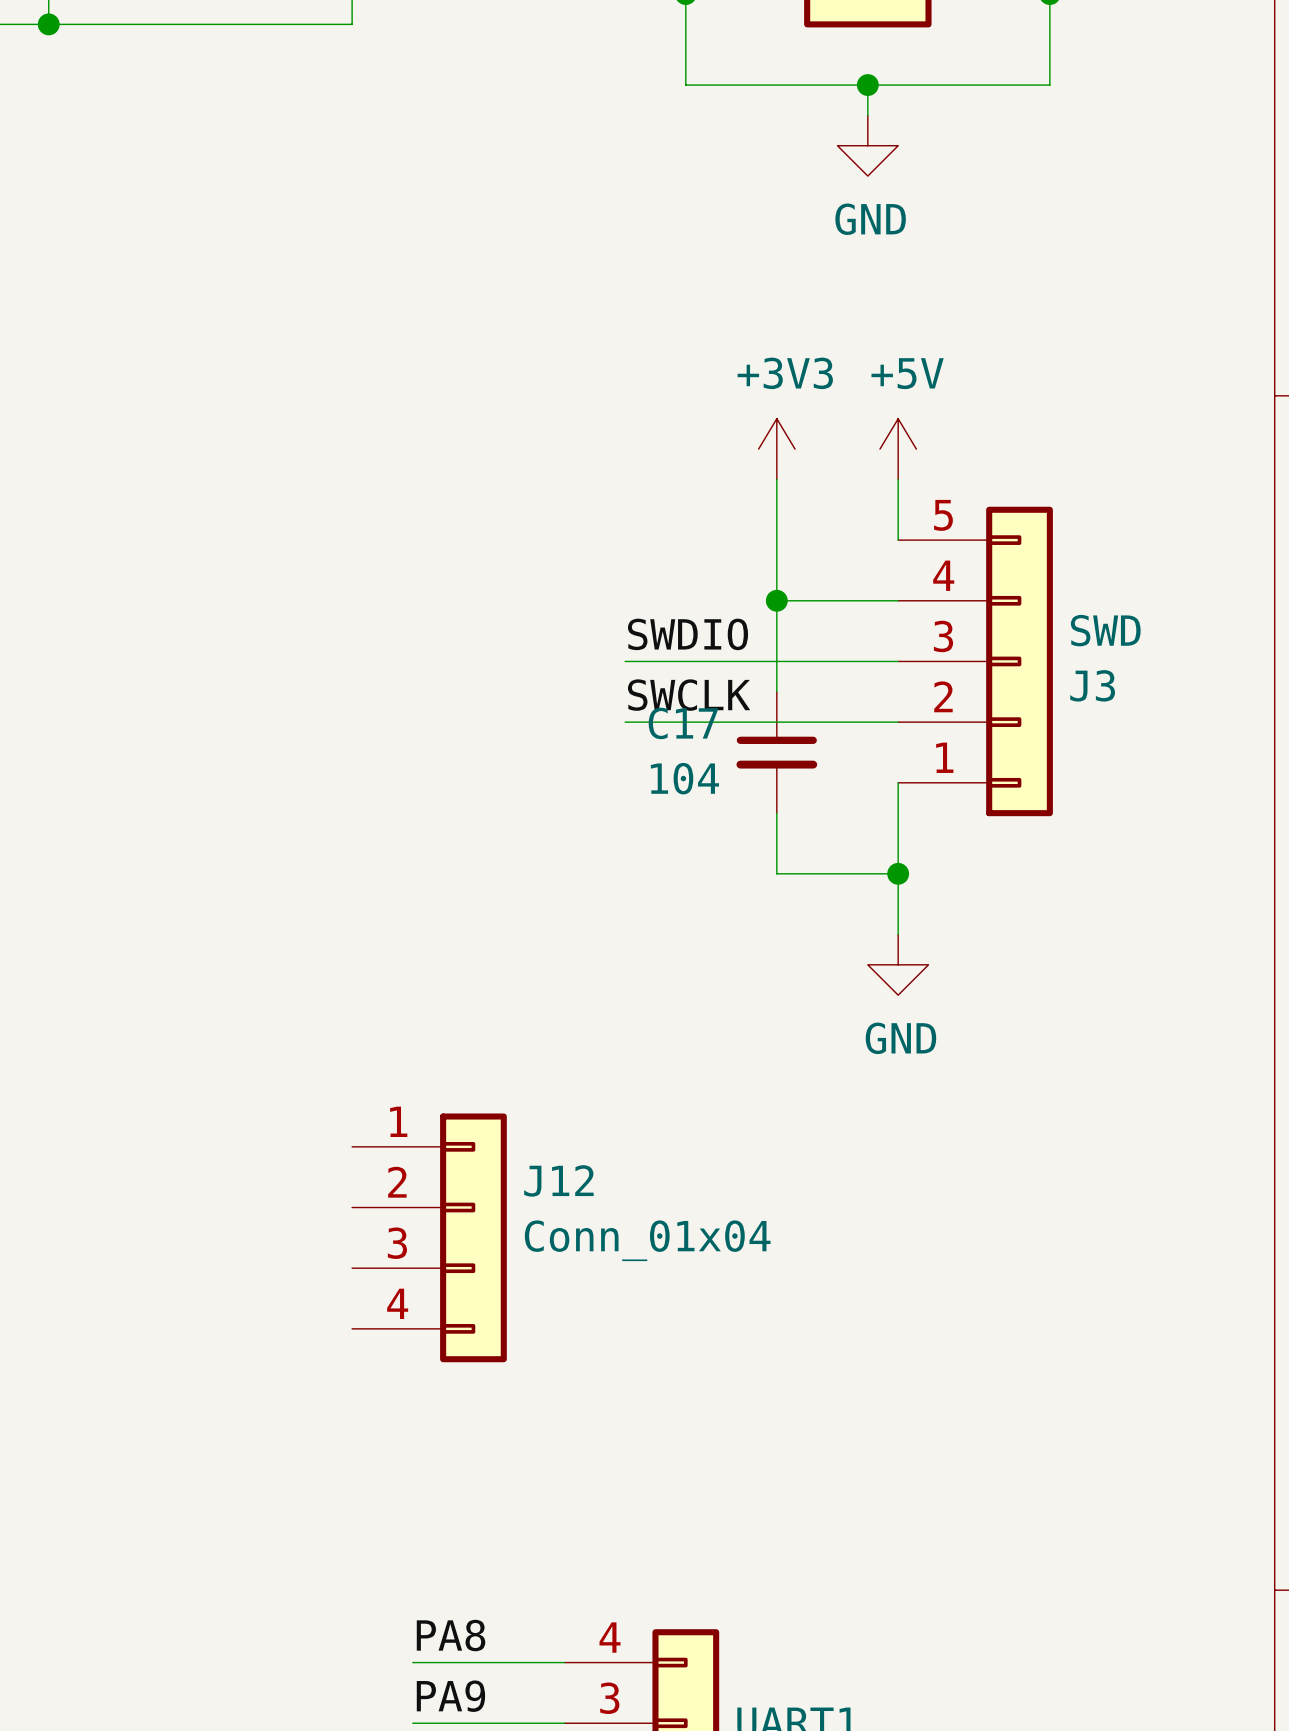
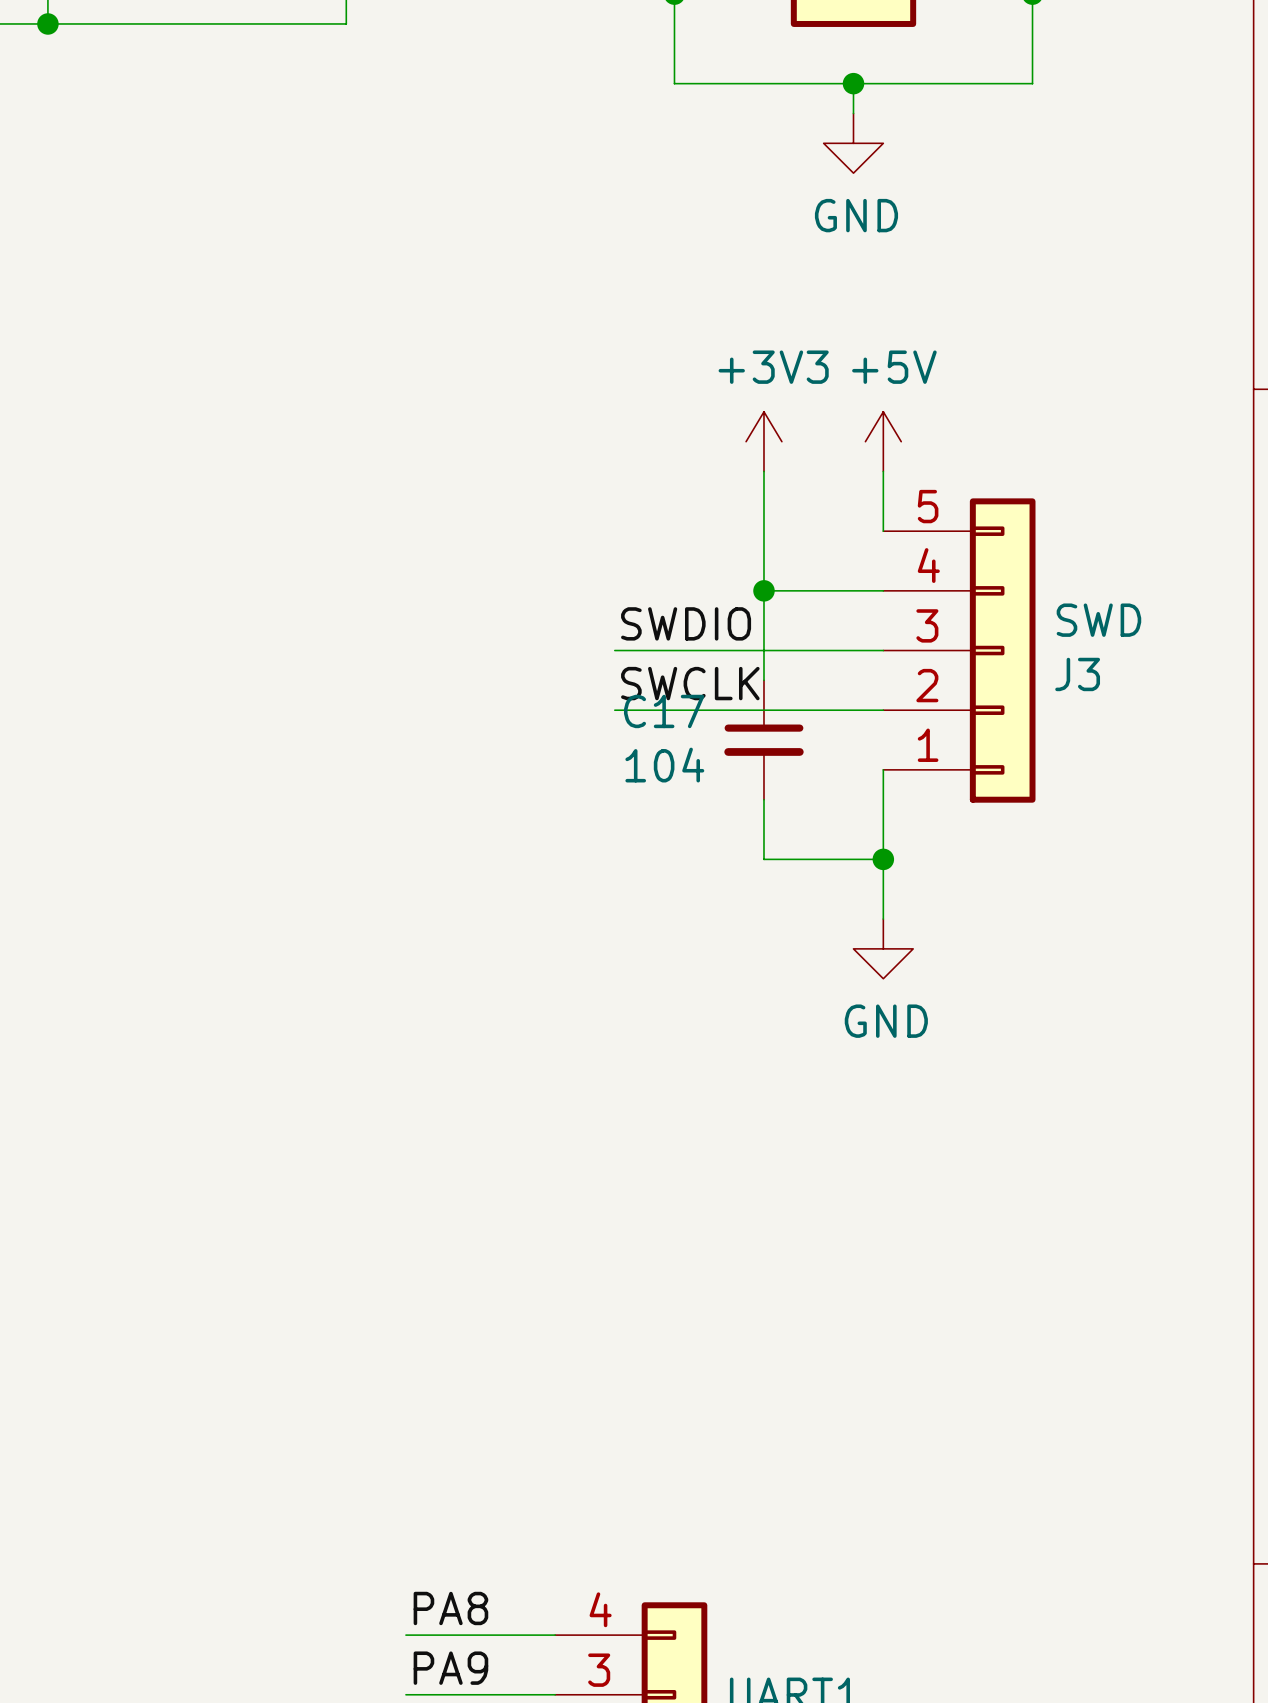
J12: Conn_01x04 (429, 1237) -> none

